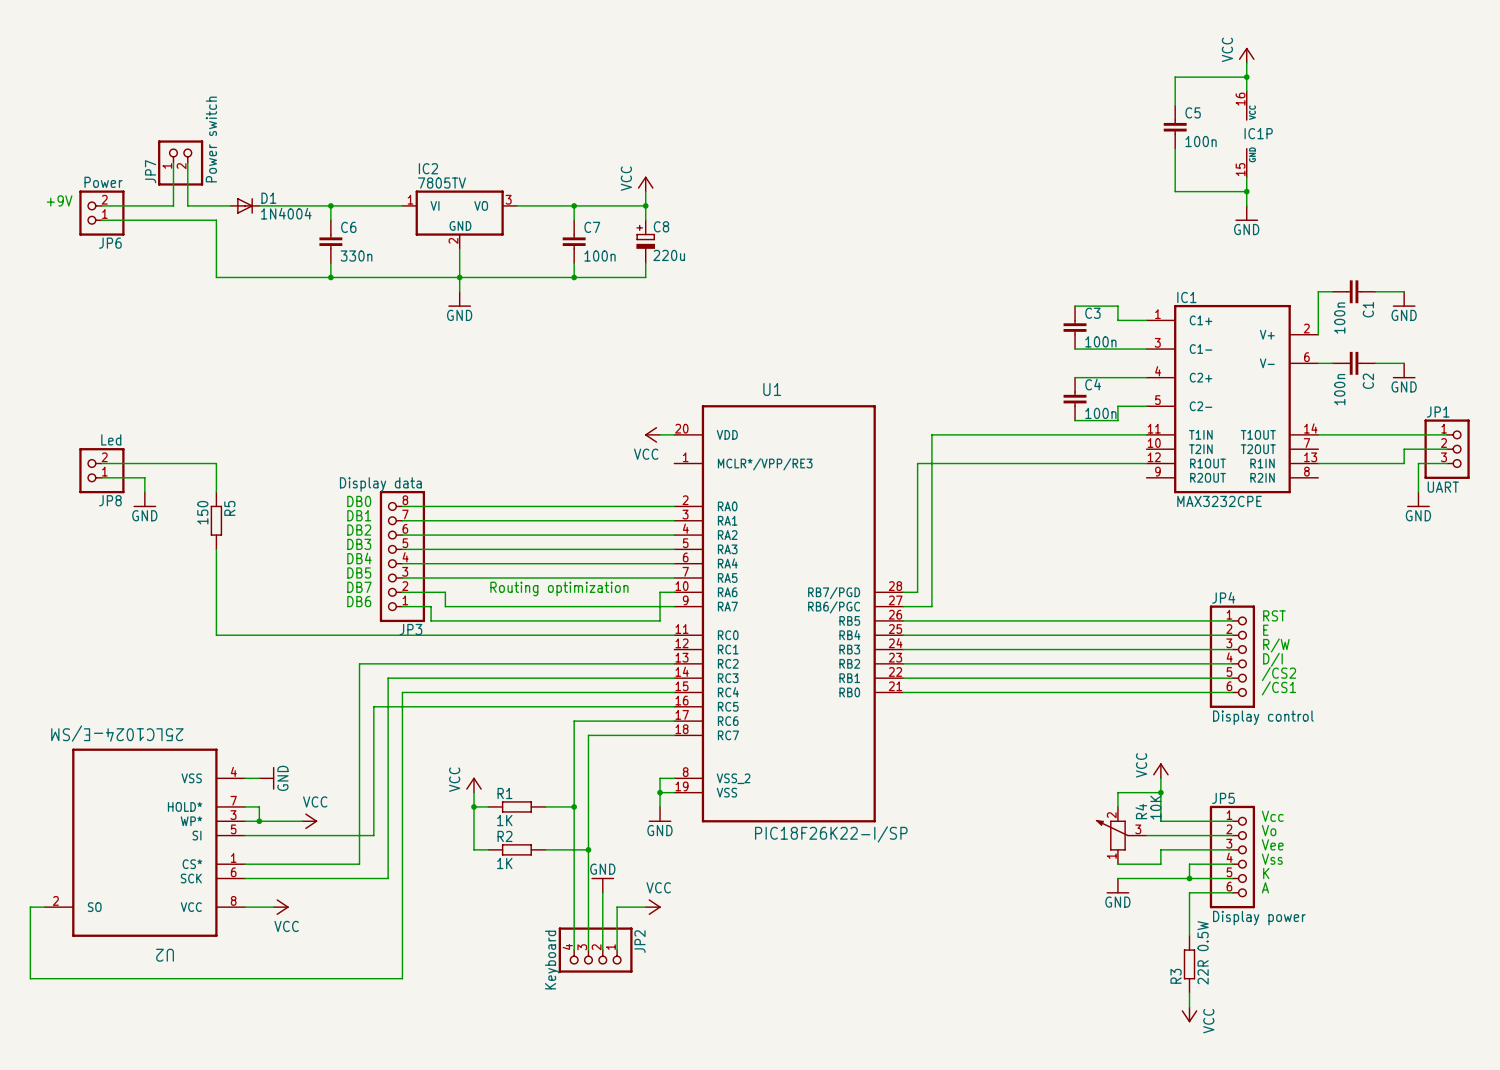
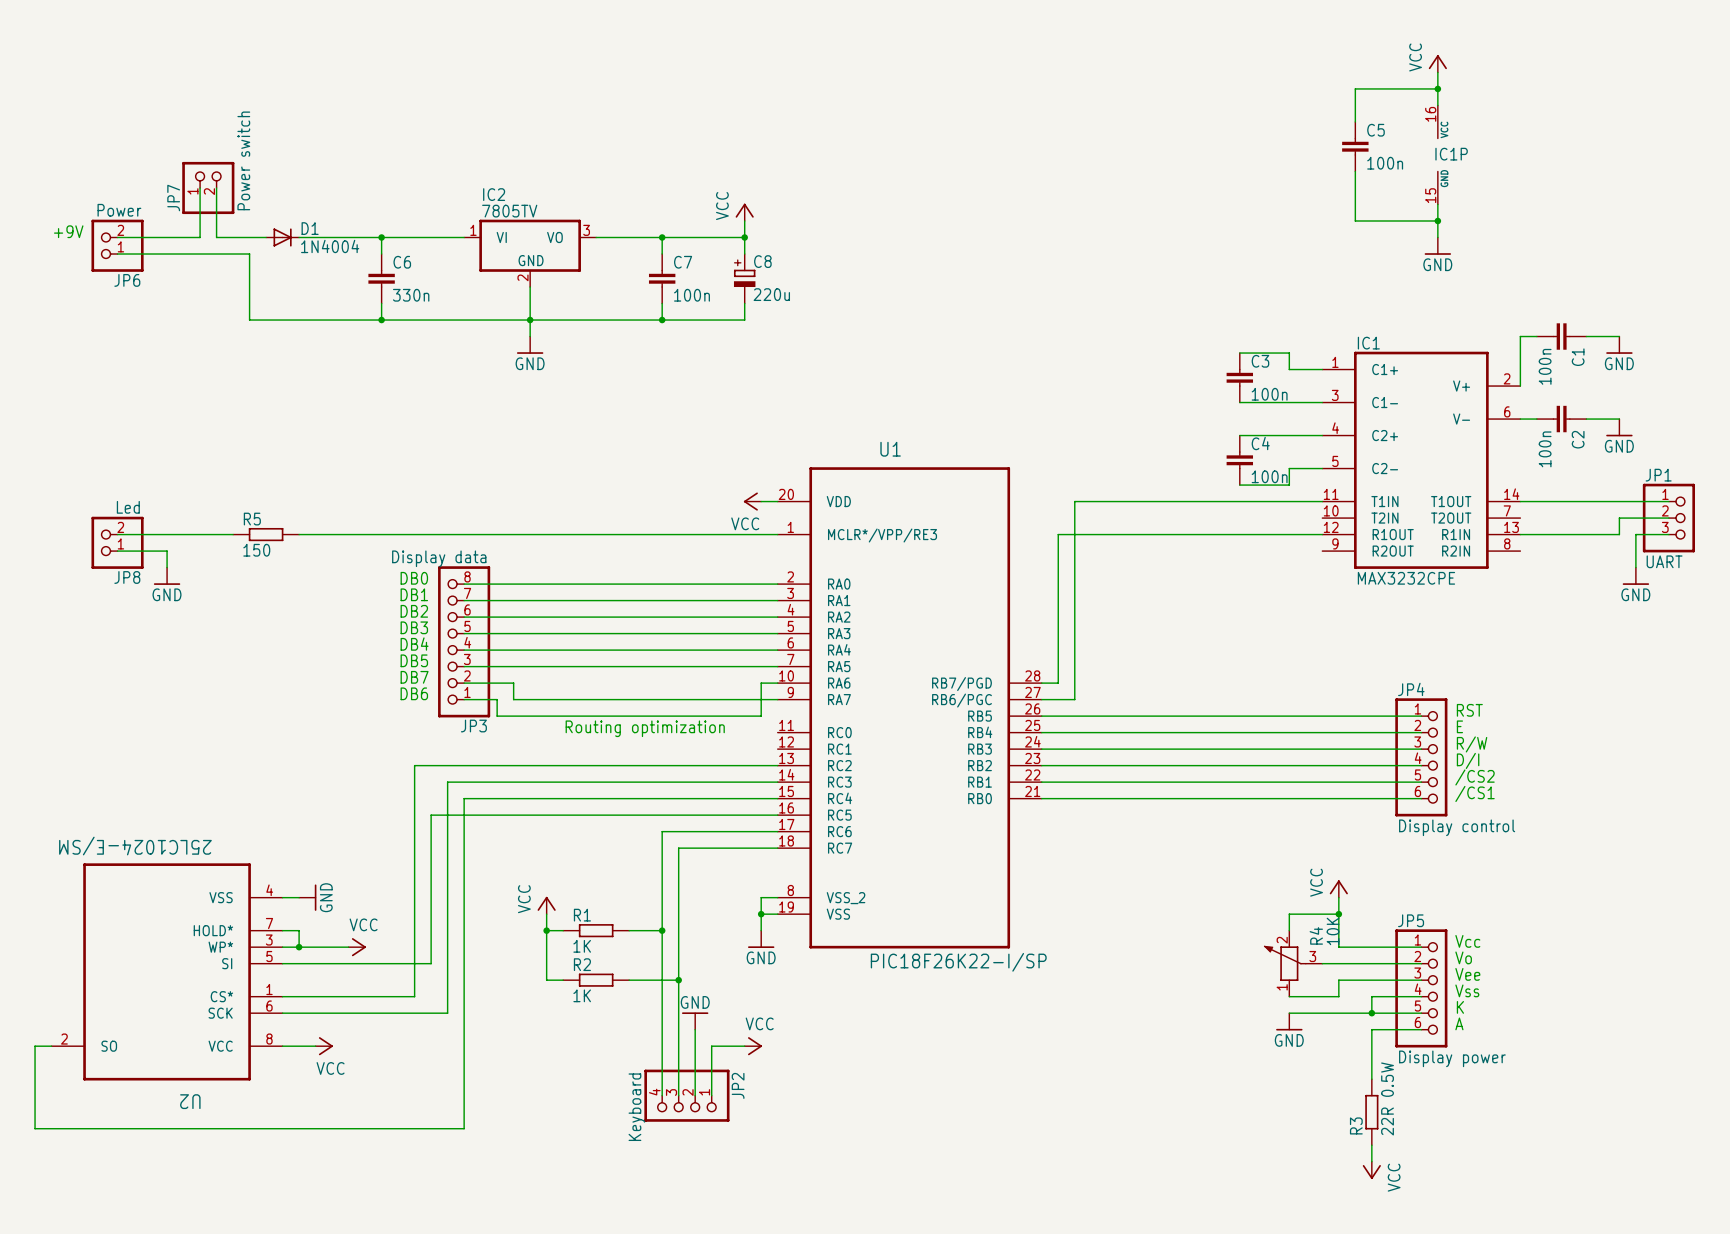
wire: (202, 463) (216, 463) (216, 492) -> none
wire: none -> (299, 534) (777, 534)
R5 name position: R5 (229, 508) -> R5 (252, 519)
R5 value position: 150 (202, 512) -> 150 (256, 550)
R5 rotation: 0° (216, 520) -> 90° clockwise (266, 534)
R5 position: (216, 520) -> (266, 534)
wire: (216, 549) (216, 635) (674, 635) -> none
text position: Routing optimization (559, 588) -> Routing optimization (645, 728)

